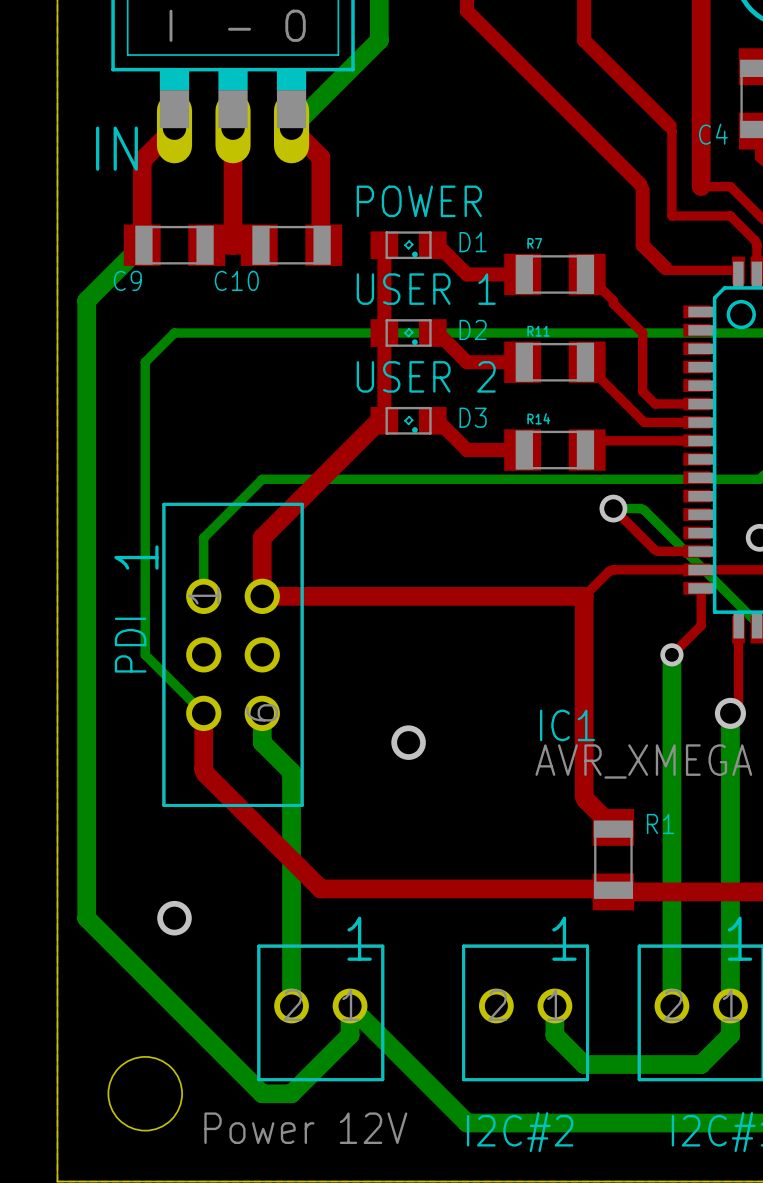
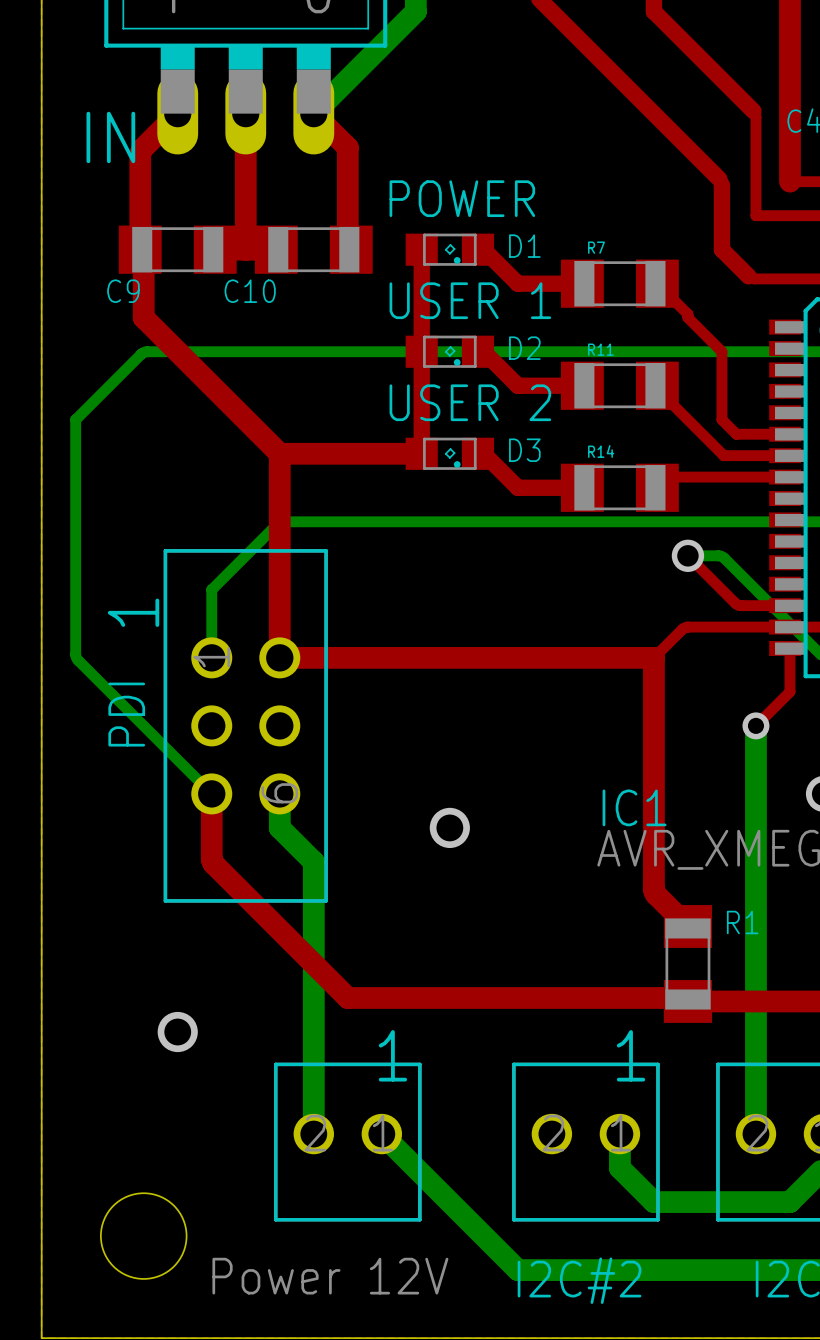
bottom track: (142, 245) (86, 300) (86, 391) -> (177, 351) (143, 352) (75, 419)
top track: none -> (140, 249) (143, 256) (143, 317) (279, 453)
bottom track: (174, 333) (145, 362) (145, 654) -> (75, 654) (78, 660) (143, 725)
bottom track width: thick (86, 391) (86, 593) -> thin (75, 419) (75, 654)
top track: none -> (279, 453) (415, 453)
top track: (379, 420) (262, 537) -> (279, 453) (279, 589)
bottom track: (86, 593) (86, 918) (262, 1093) (291, 1093) (350, 1035) (350, 1005) -> none

